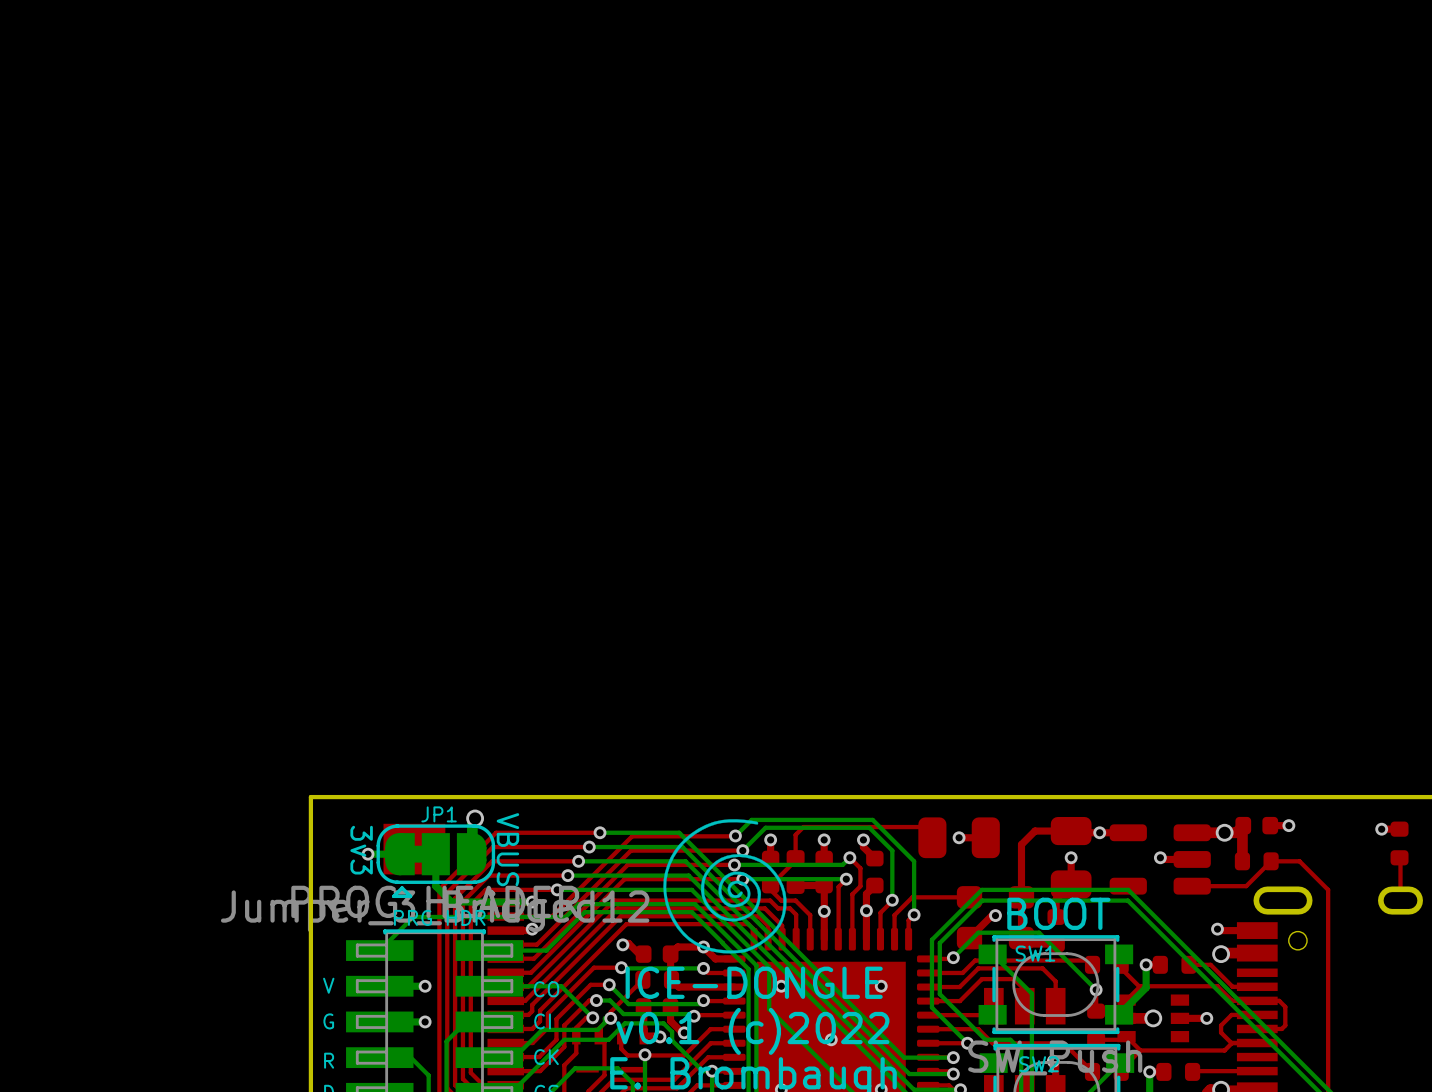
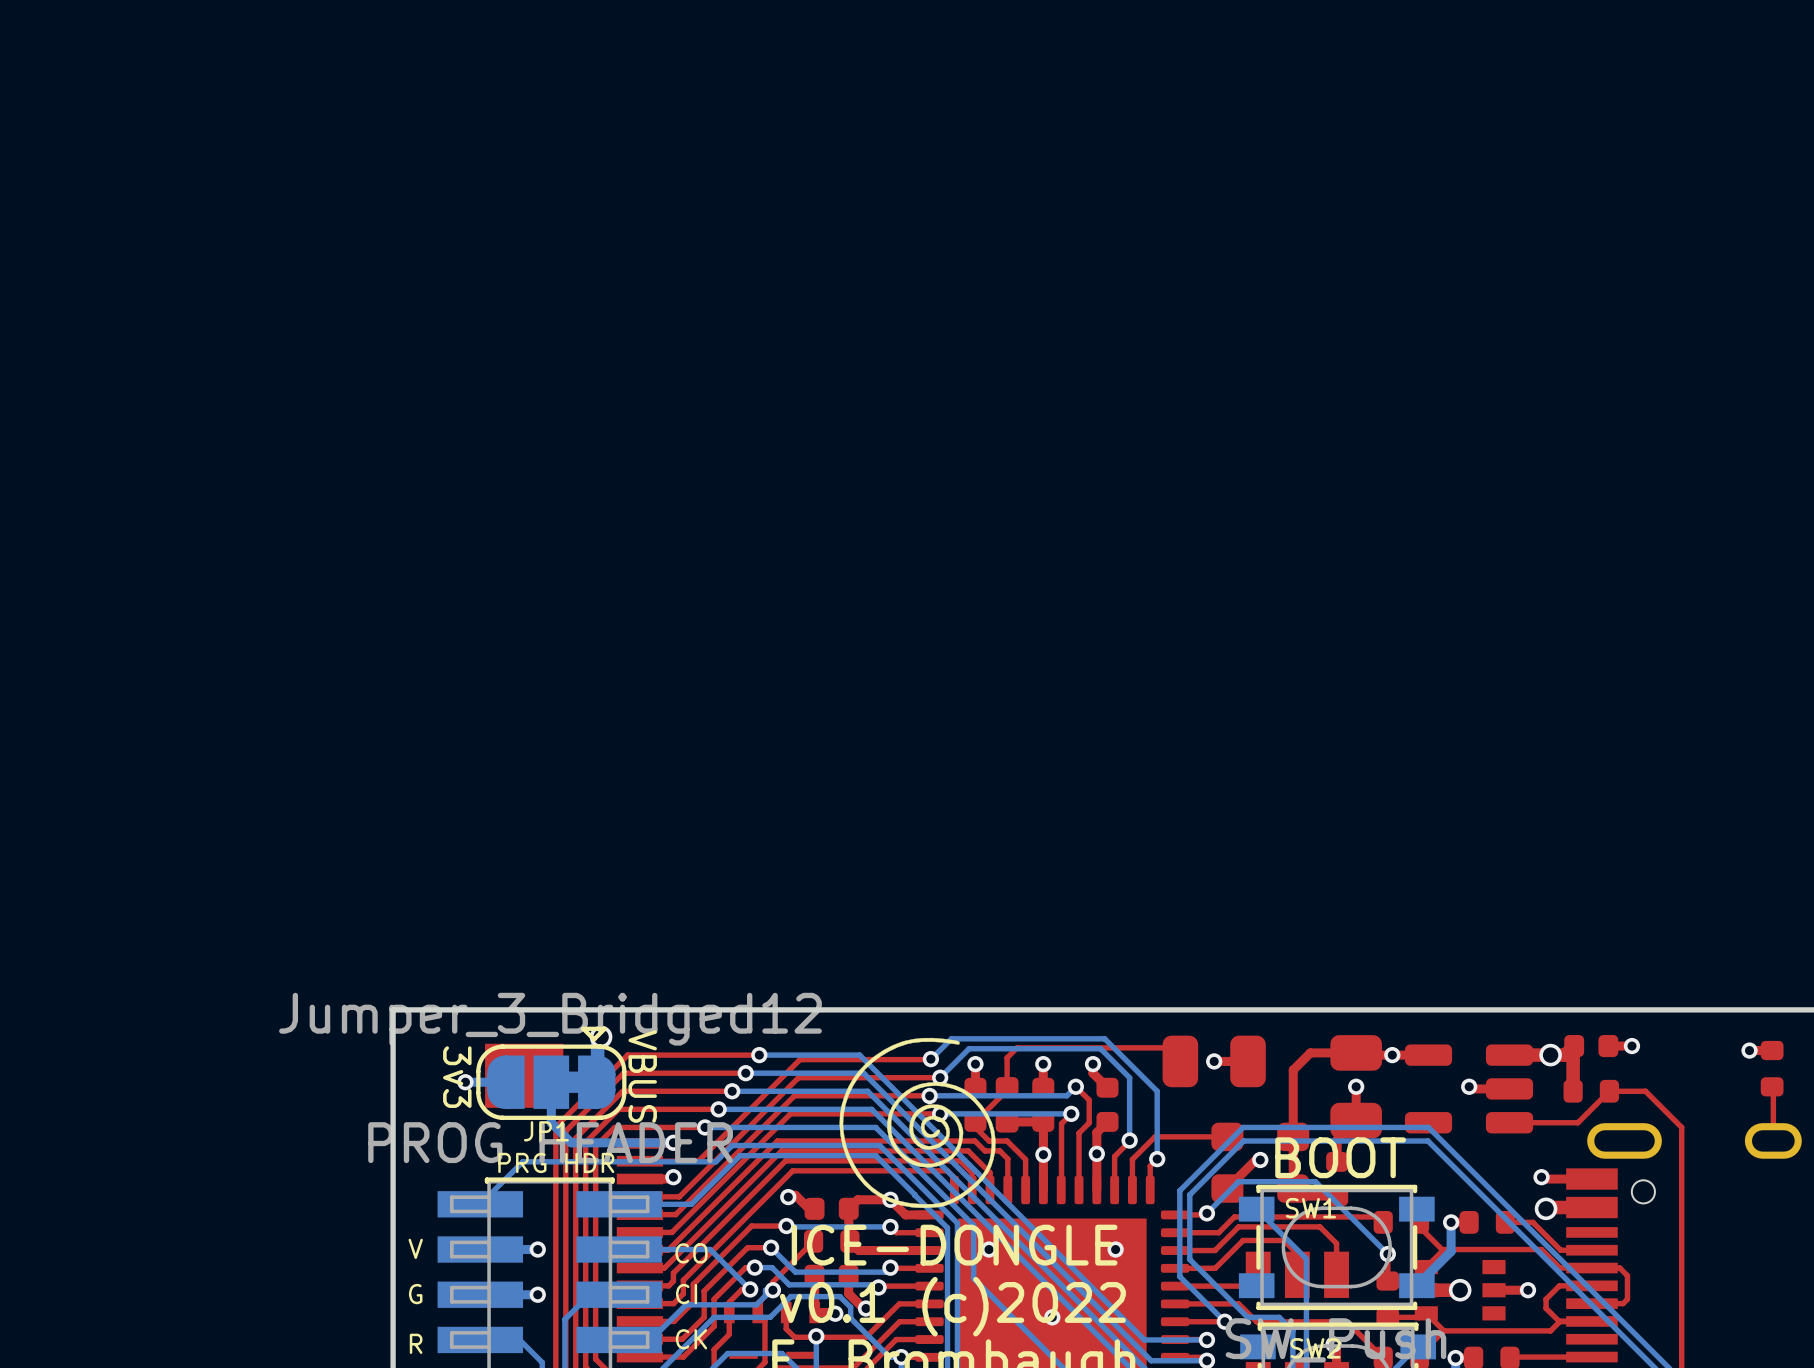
JP1 rotation: 0° (435, 861) -> 180° (551, 1073)

